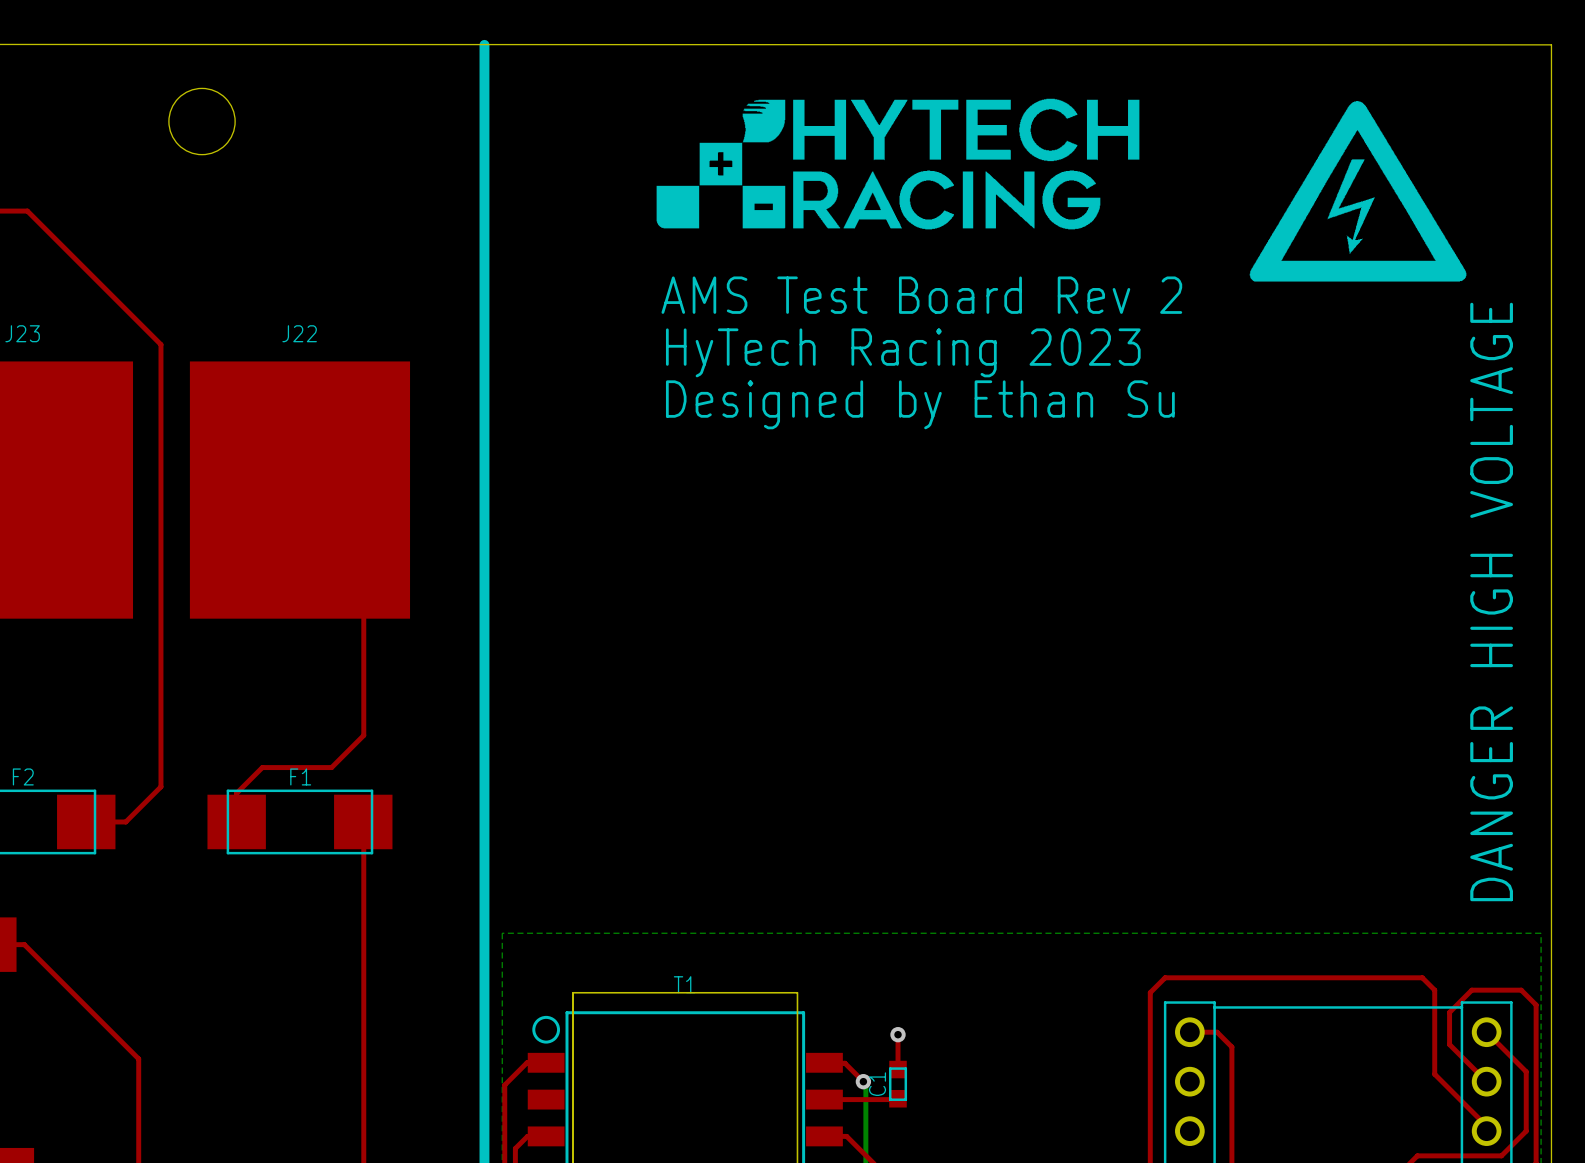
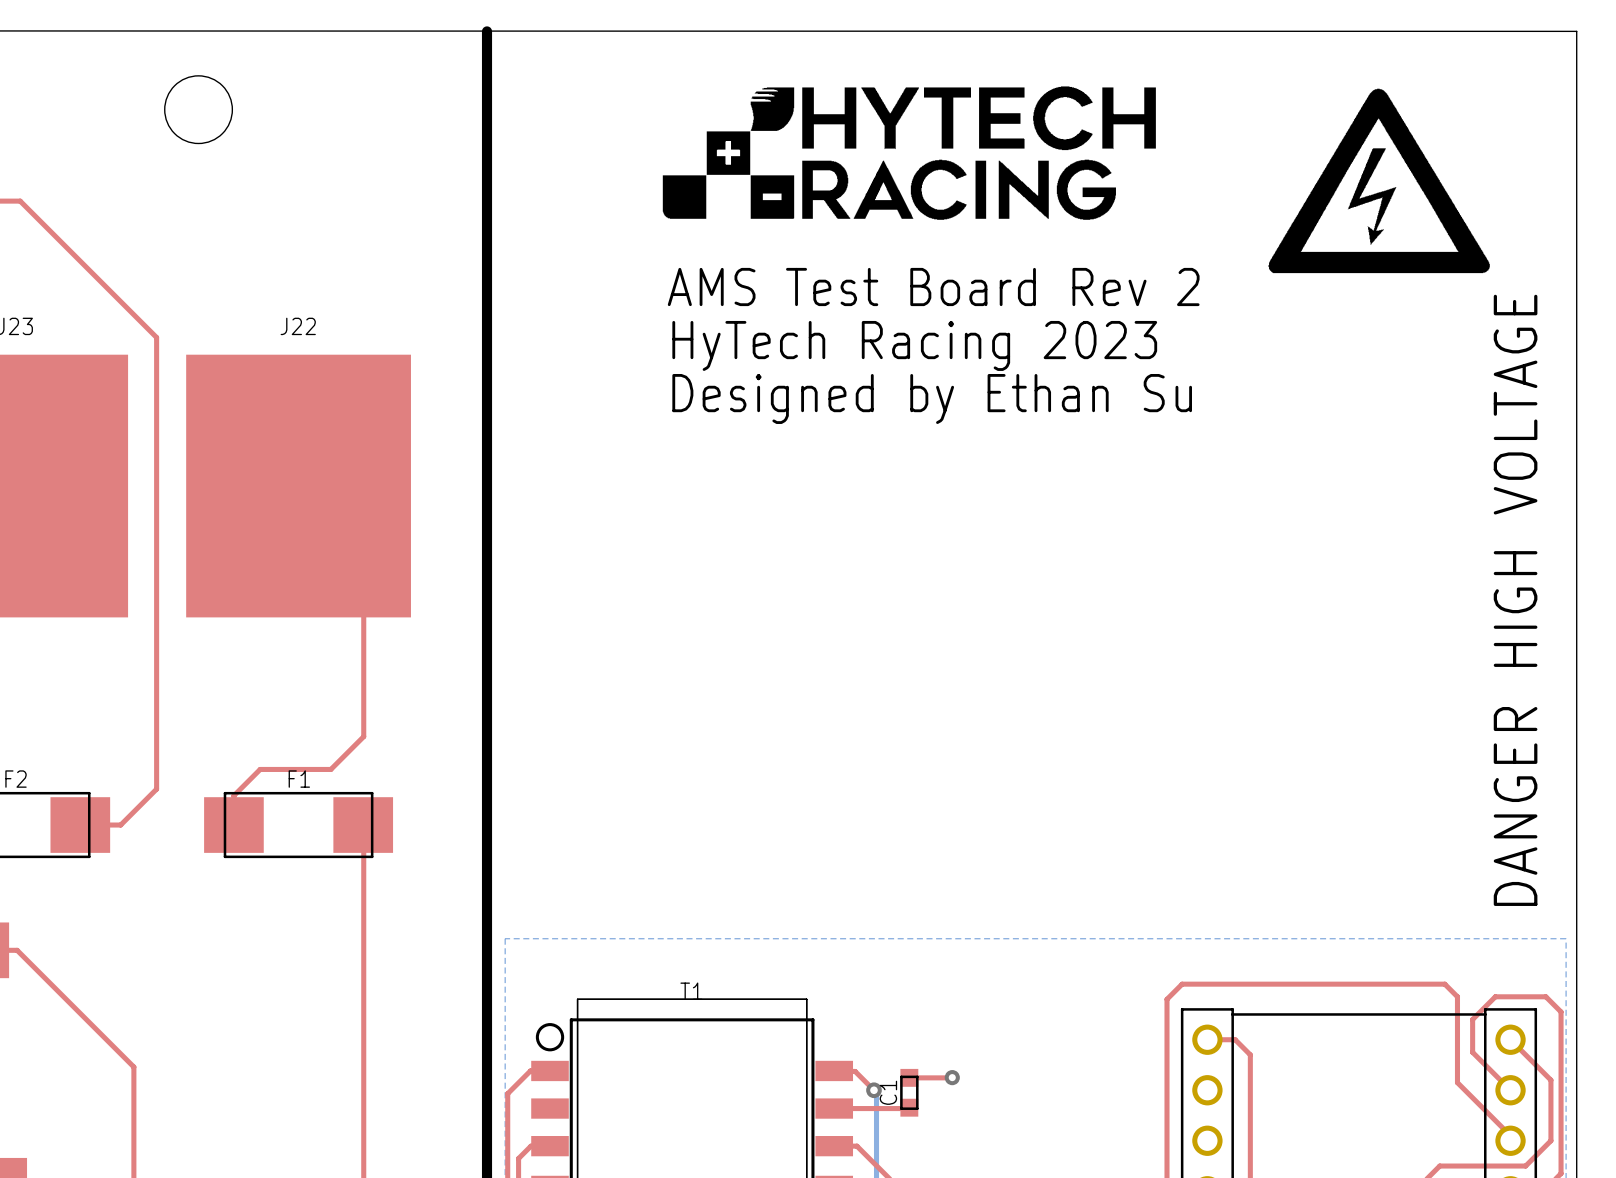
top track: (898, 1034) (898, 1069) -> (952, 1077) (909, 1077)
via: (898, 1034) -> none
via: none -> (952, 1077)

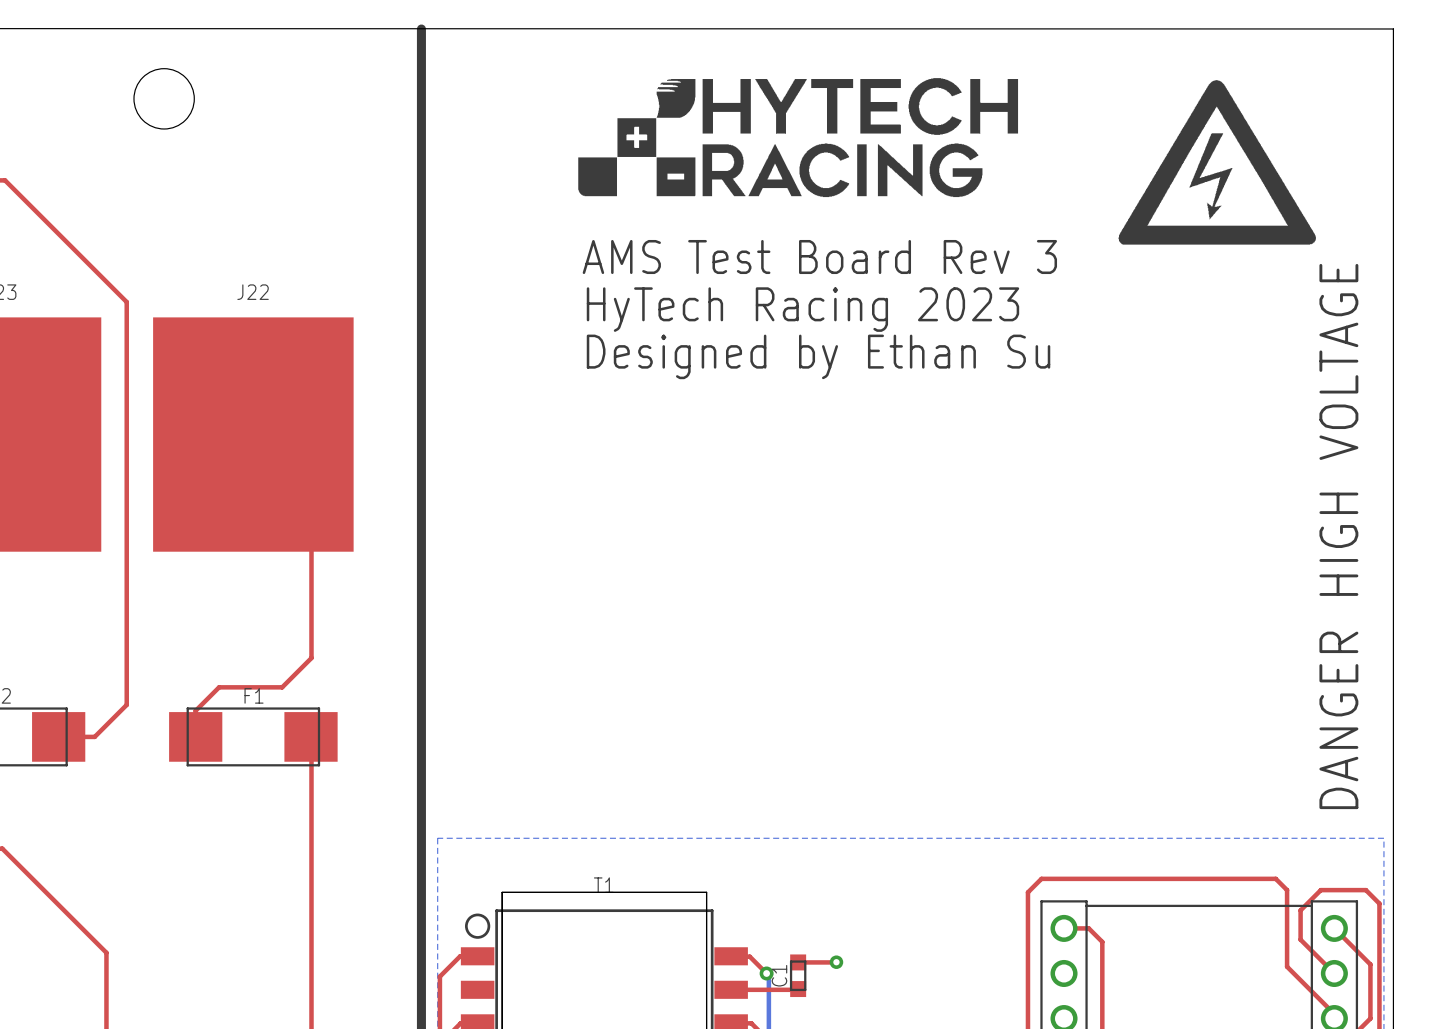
text: AMS Test Board Rev 2 (933, 287) -> AMS Test Board Rev 3 (819, 257)

